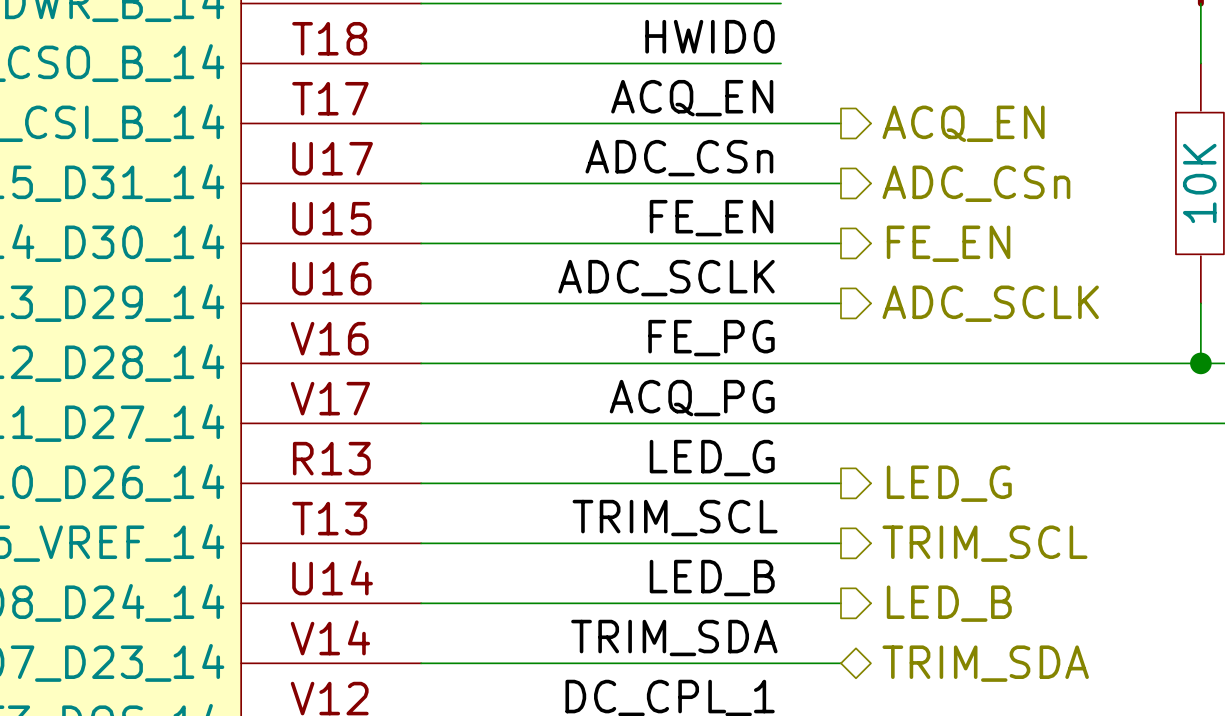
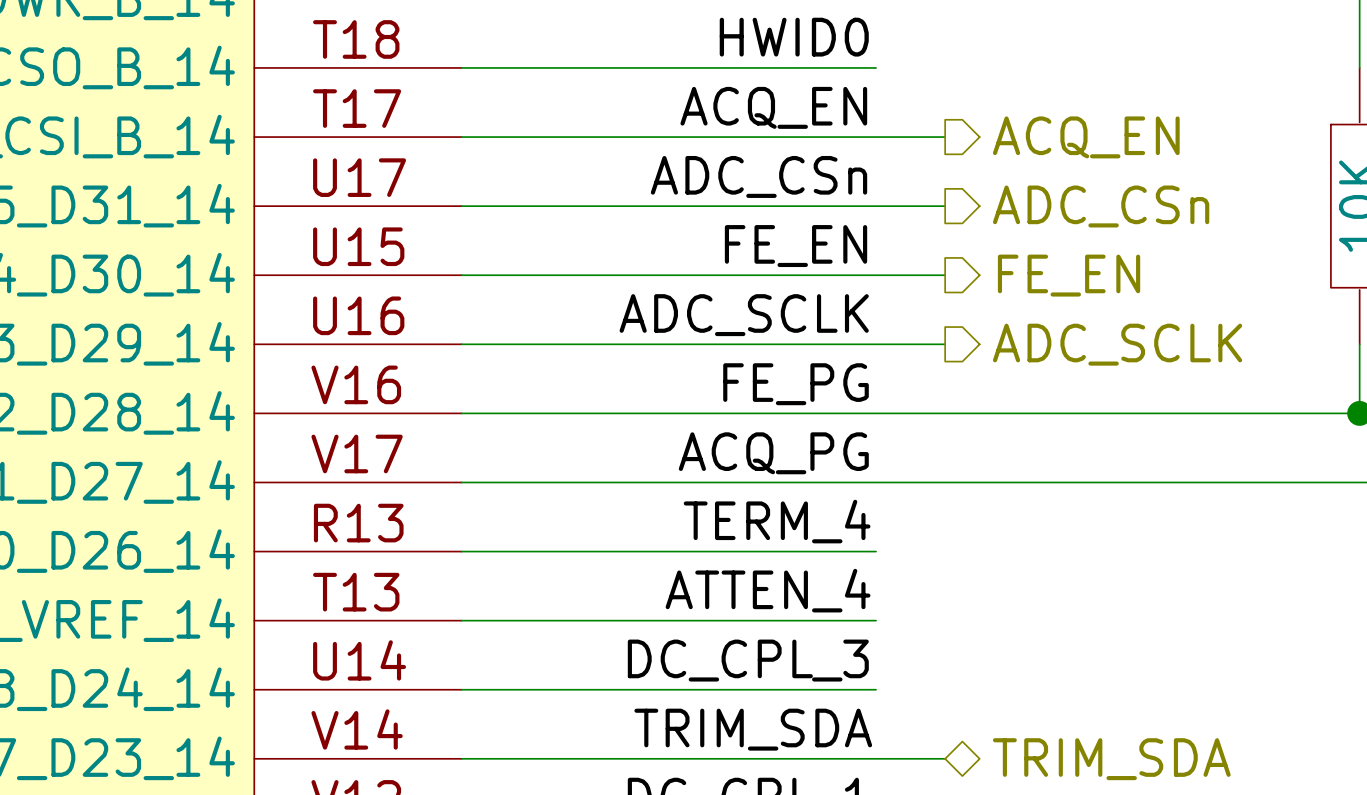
label: LED_G (712, 458) -> TERM_4 (777, 521)
wire: (781, 483) (840, 483) -> none
hierarchical label: LED_G (949, 483) -> none
label: TRIM_SCL (675, 518) -> ATTEN_4 (768, 590)
wire: (781, 543) (840, 543) -> none
hierarchical label: TRIM_SCL (984, 543) -> none
label: LED_B (712, 578) -> DC_CPL_3 (748, 660)
wire: (781, 603) (840, 603) -> none
hierarchical label: LED_B (949, 603) -> none

